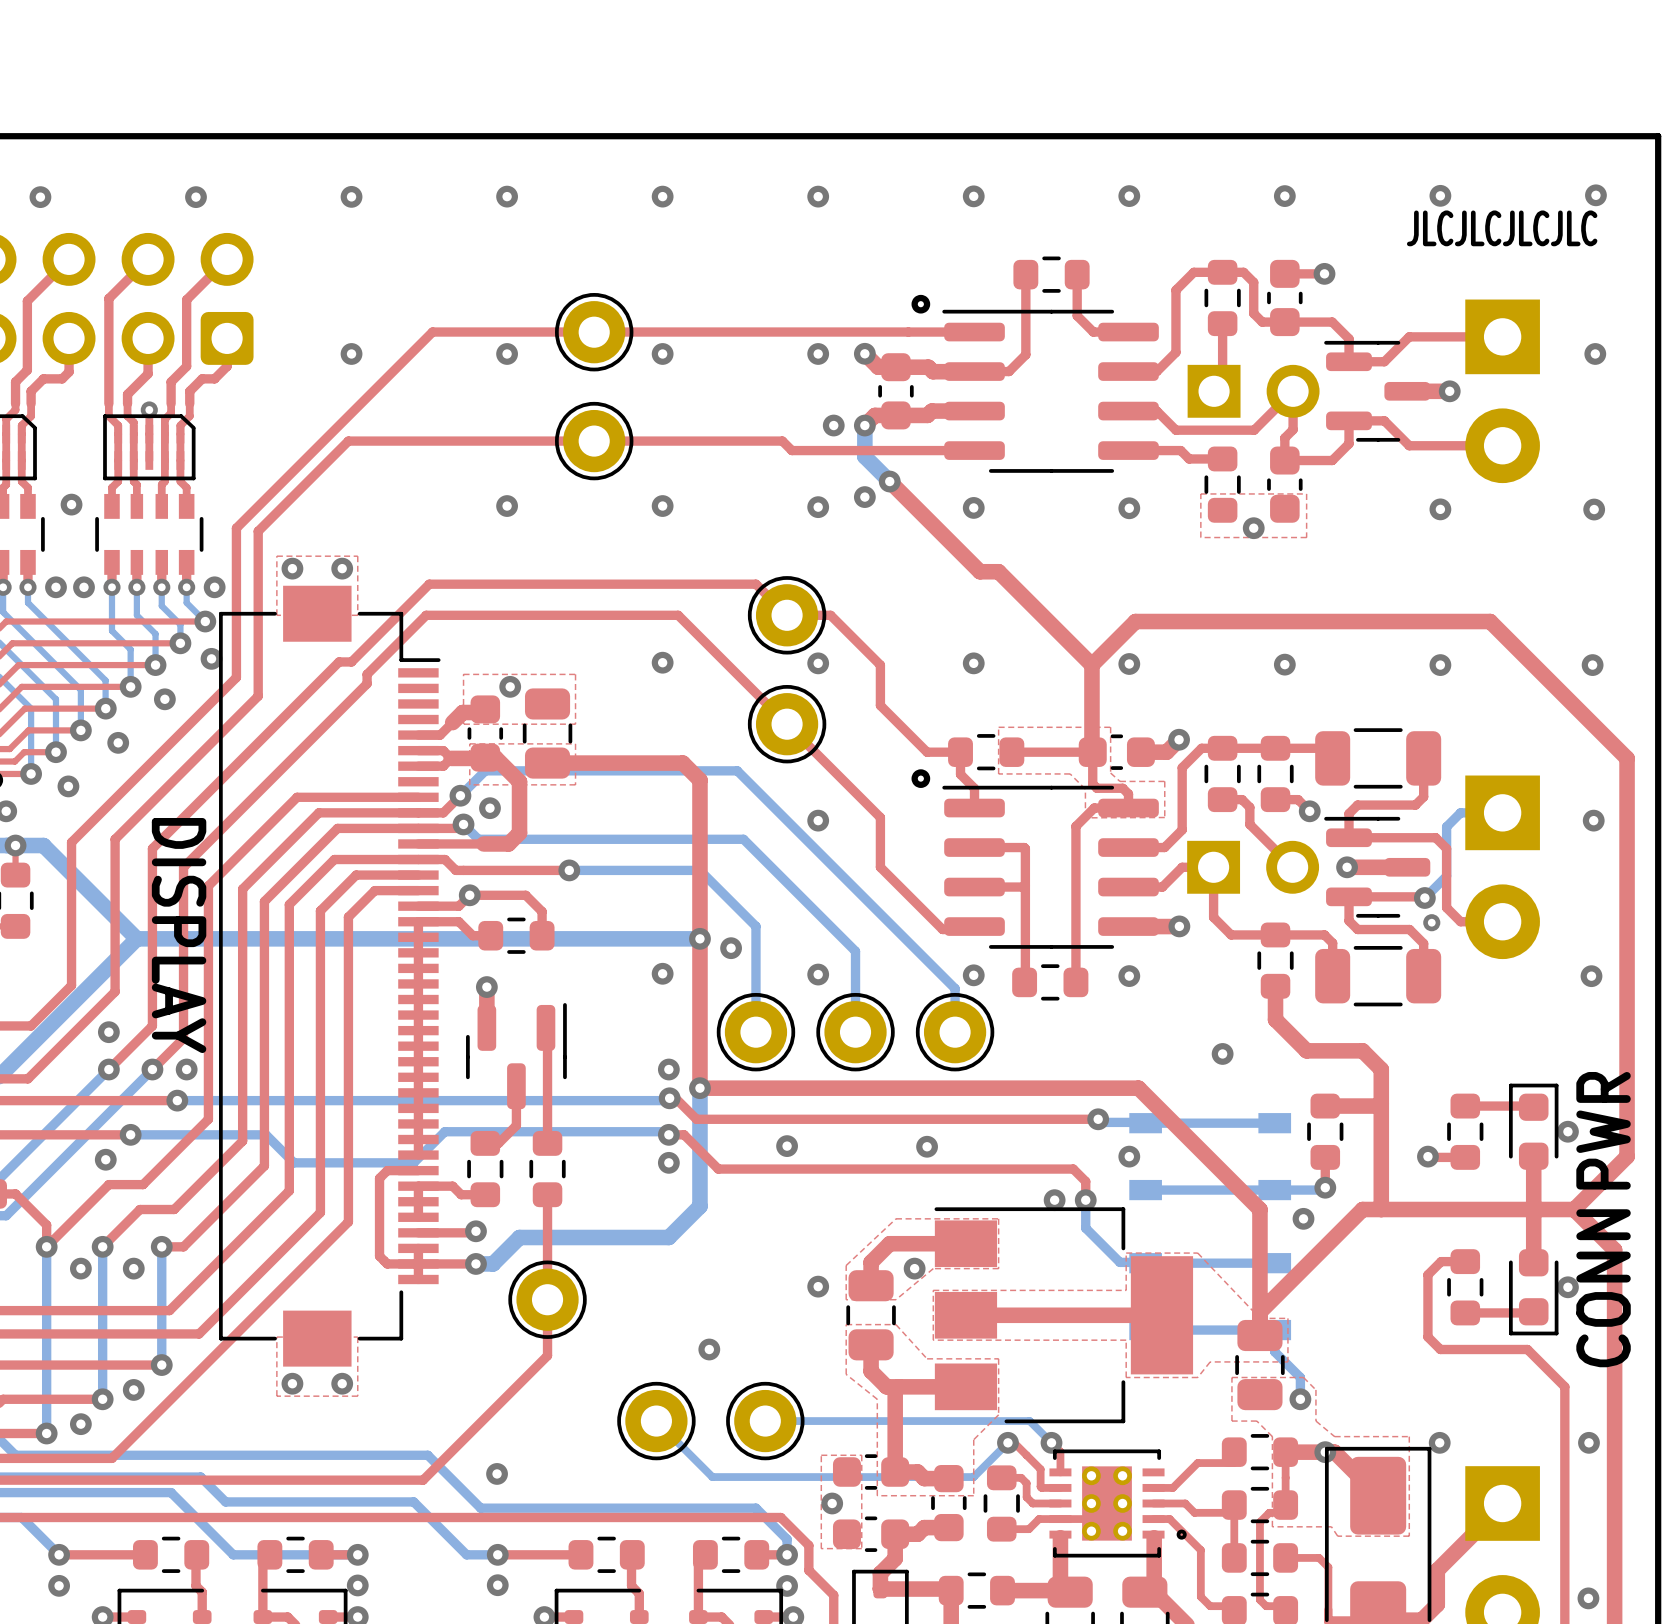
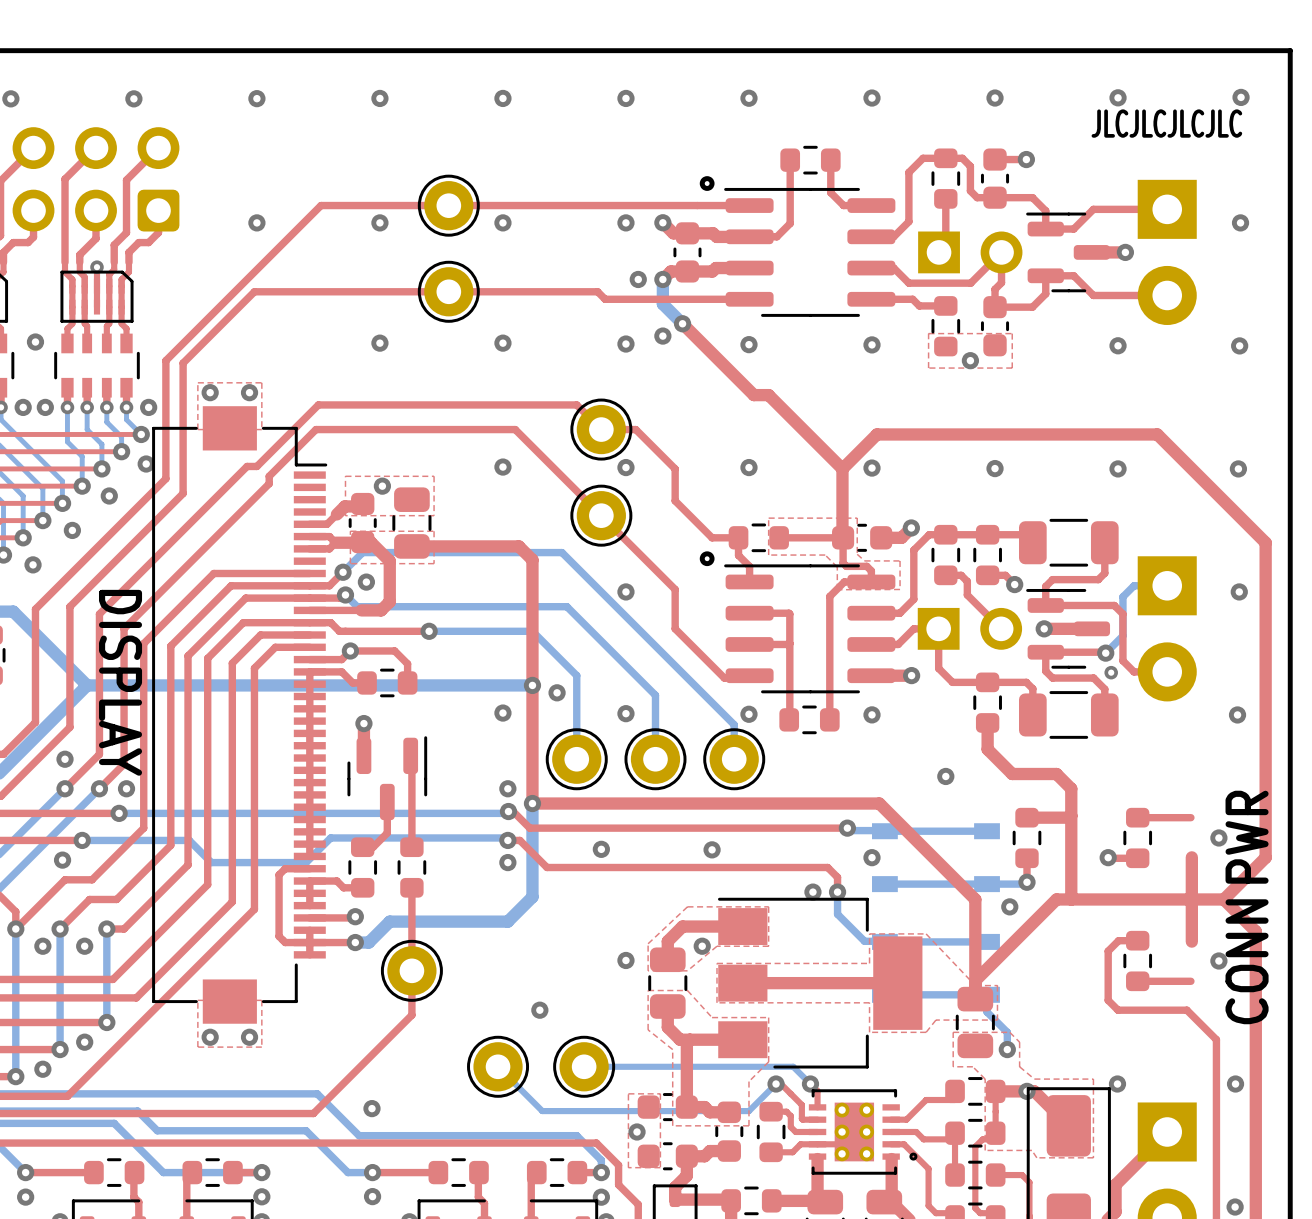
part: (1533, 1126) -> none
part: (1533, 1292) -> none

